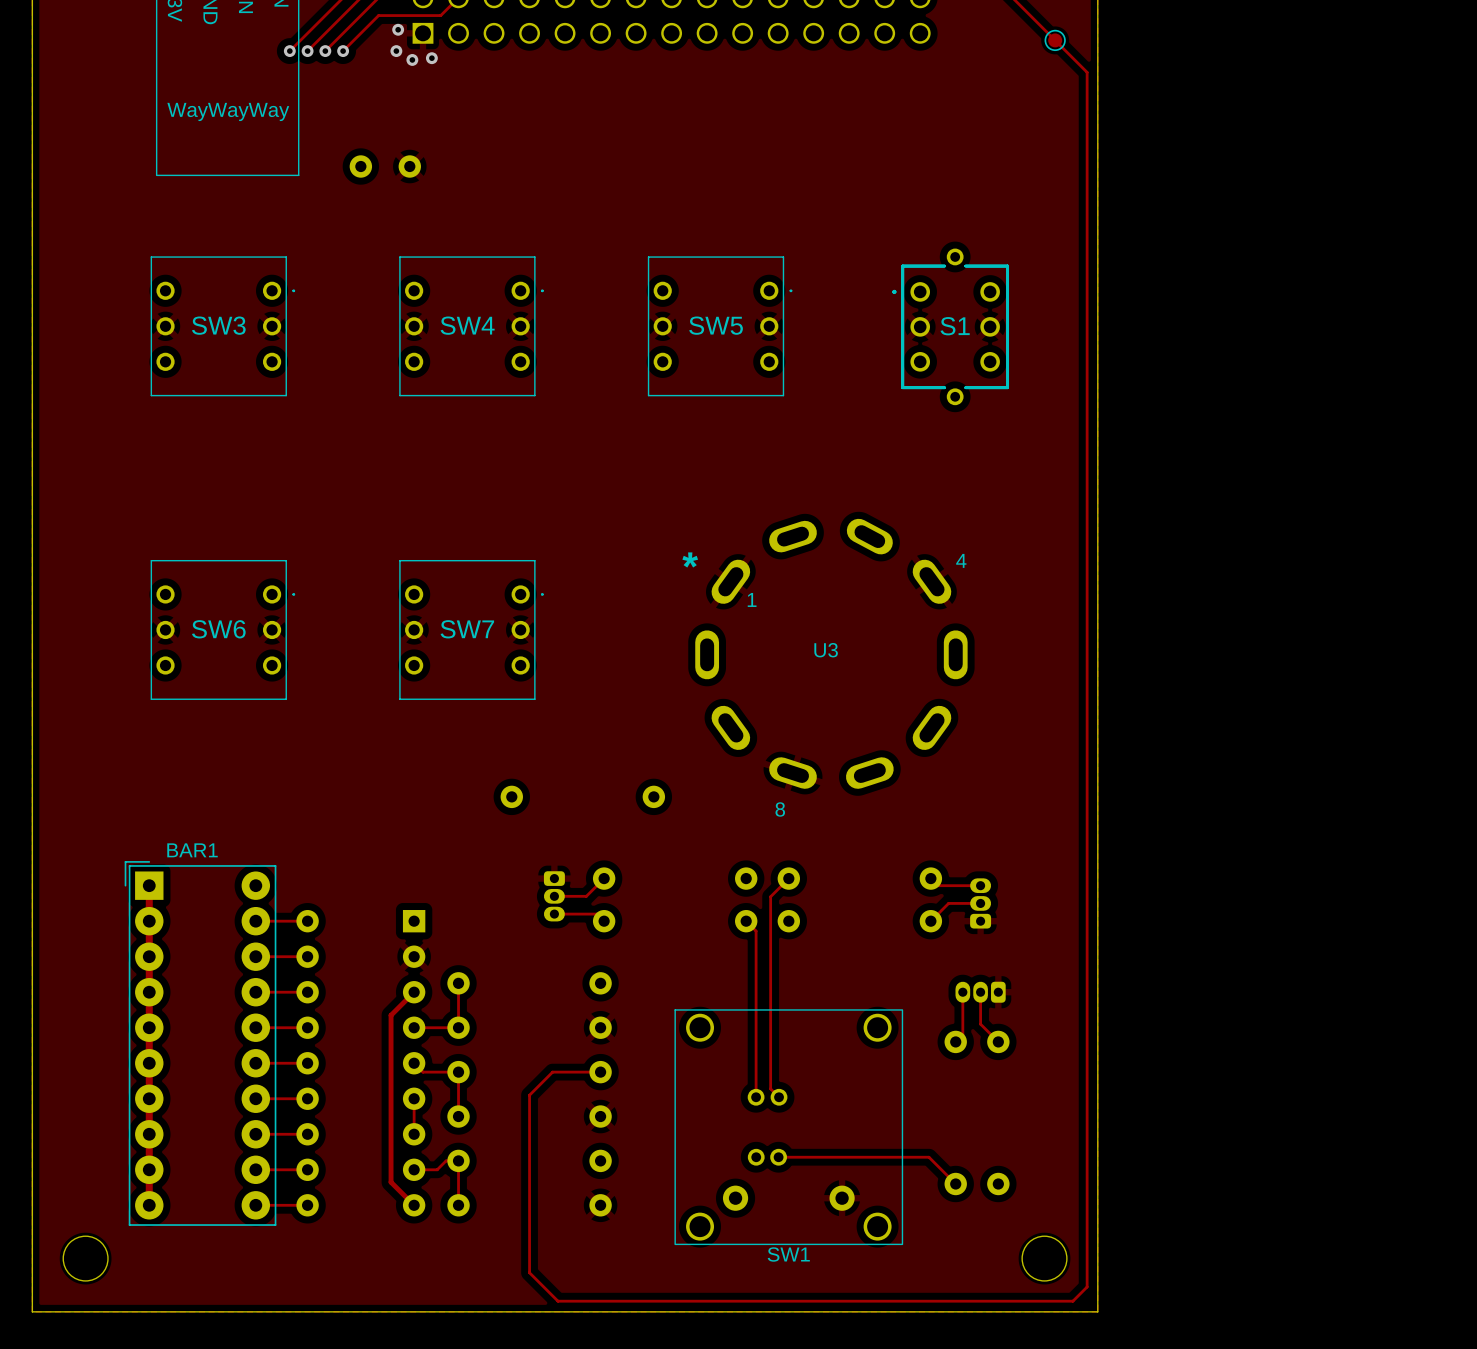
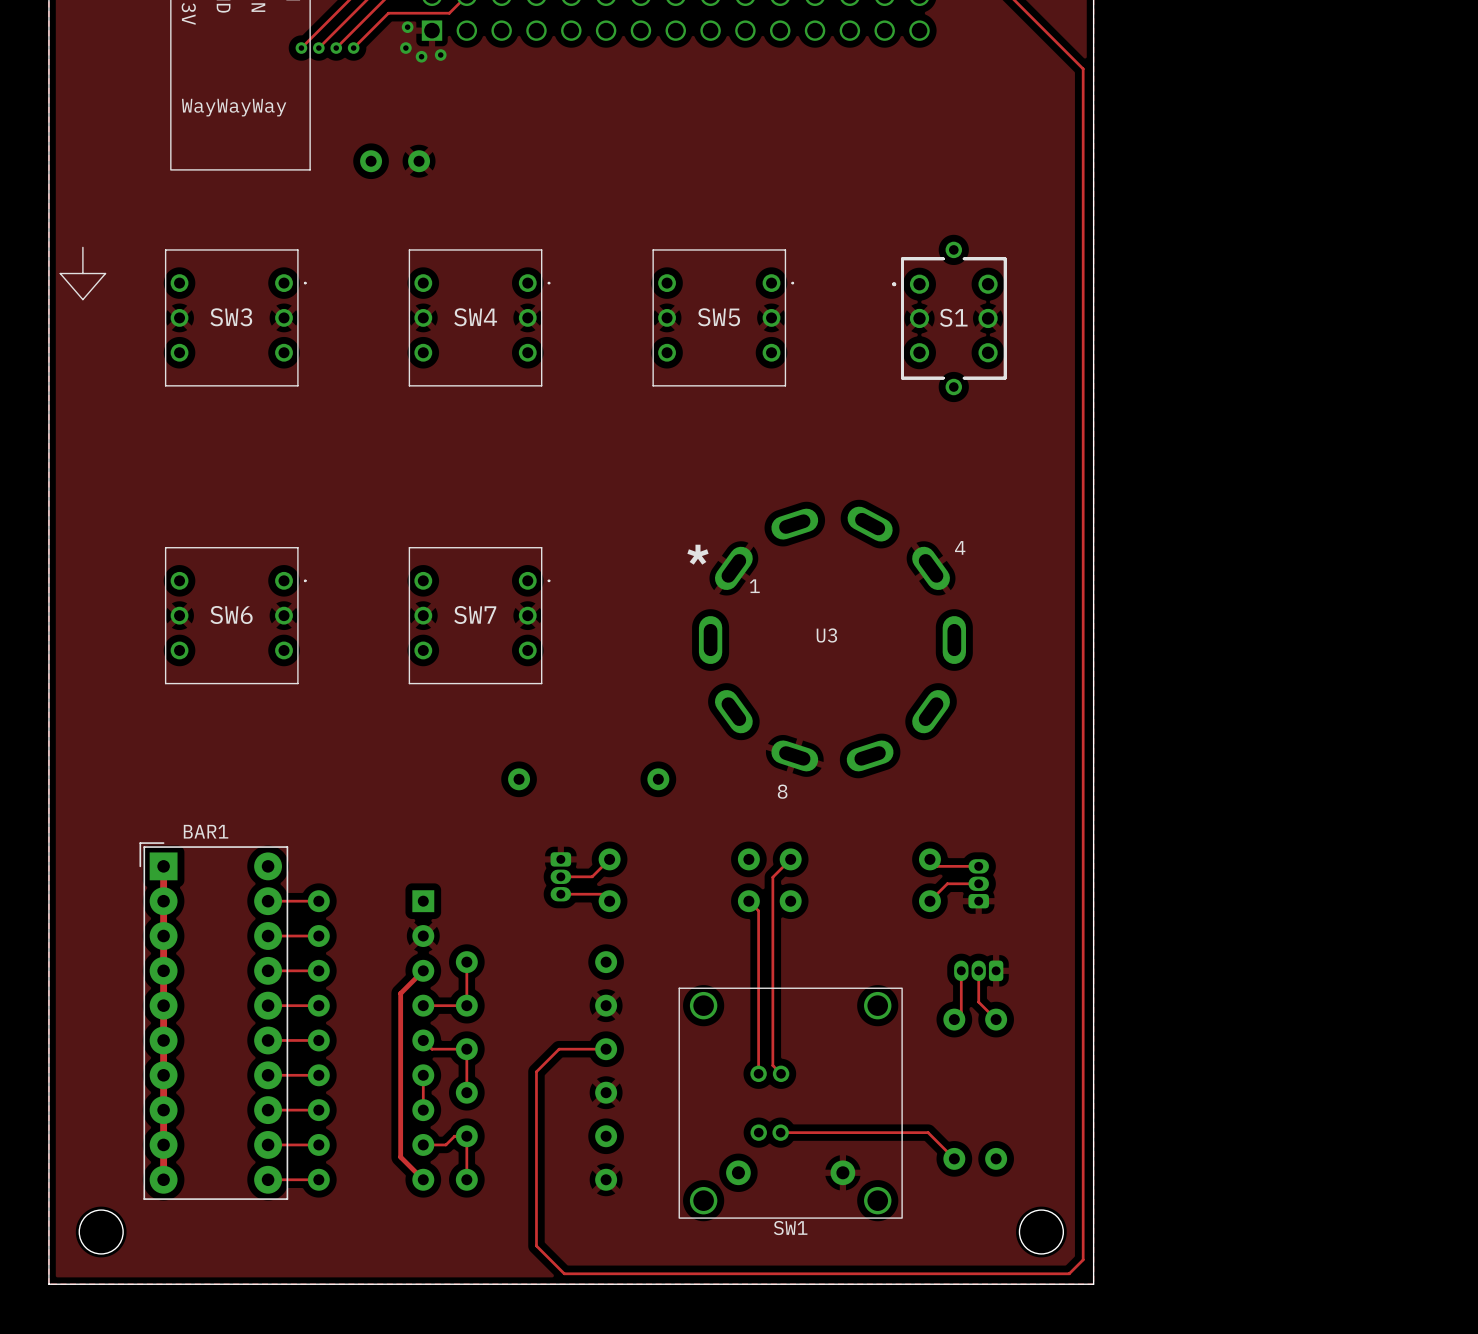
part: (1055, 40) -> none
line: none -> (82, 247) (82, 273)
line: none -> (60, 273) (82, 299) (105, 273) (60, 273)

